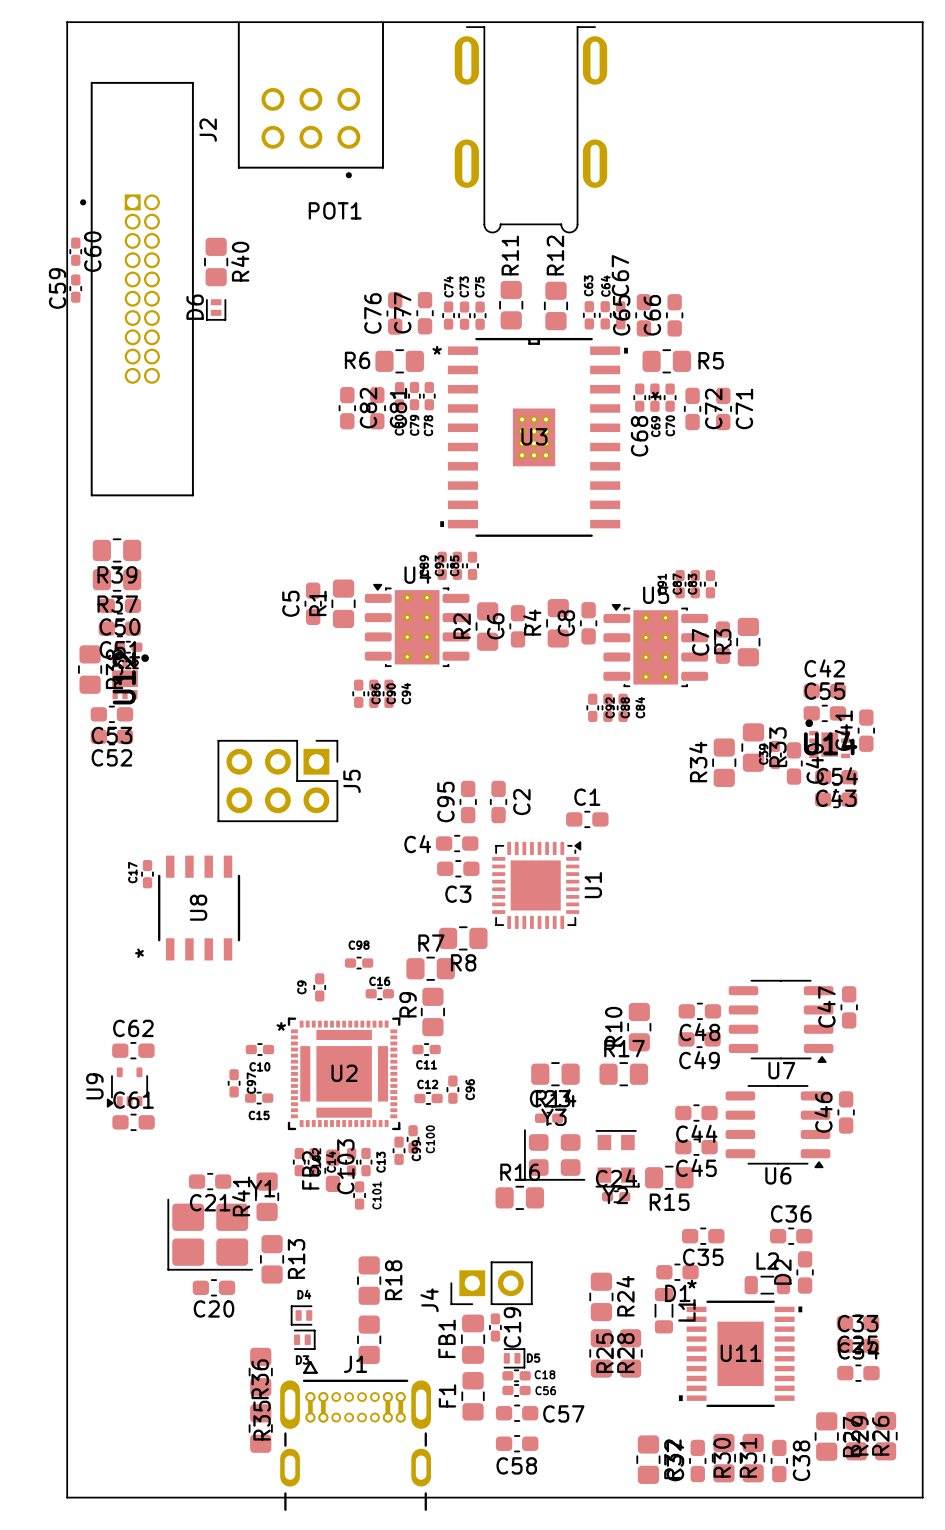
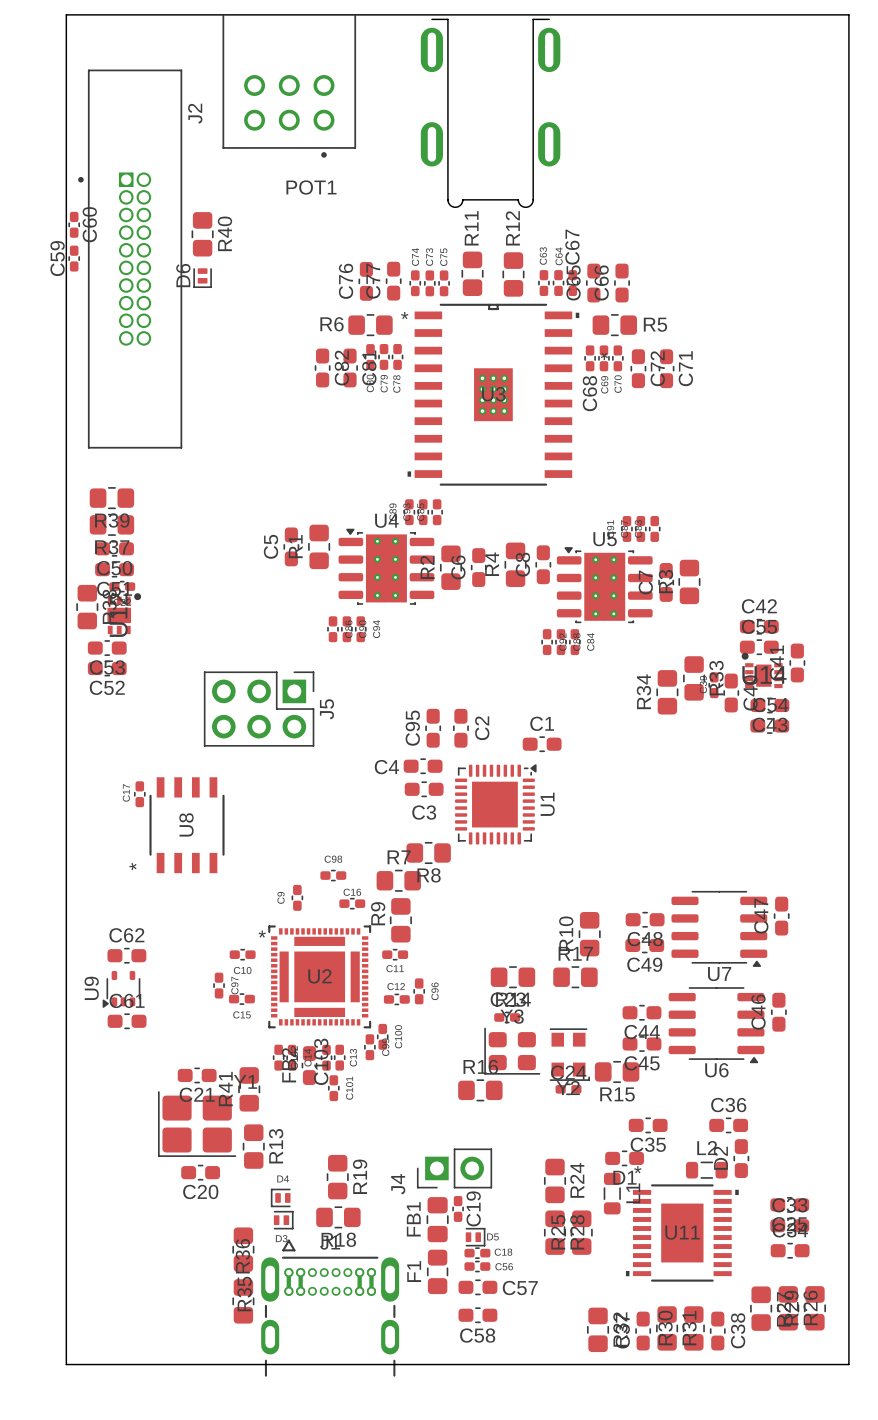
R18 rotation: 0° (369, 1280) -> 90° clockwise (338, 1217)
R18 position: (369, 1280) -> (338, 1217)
R19: none -> (337, 1177)
part: (369, 1339) -> none

